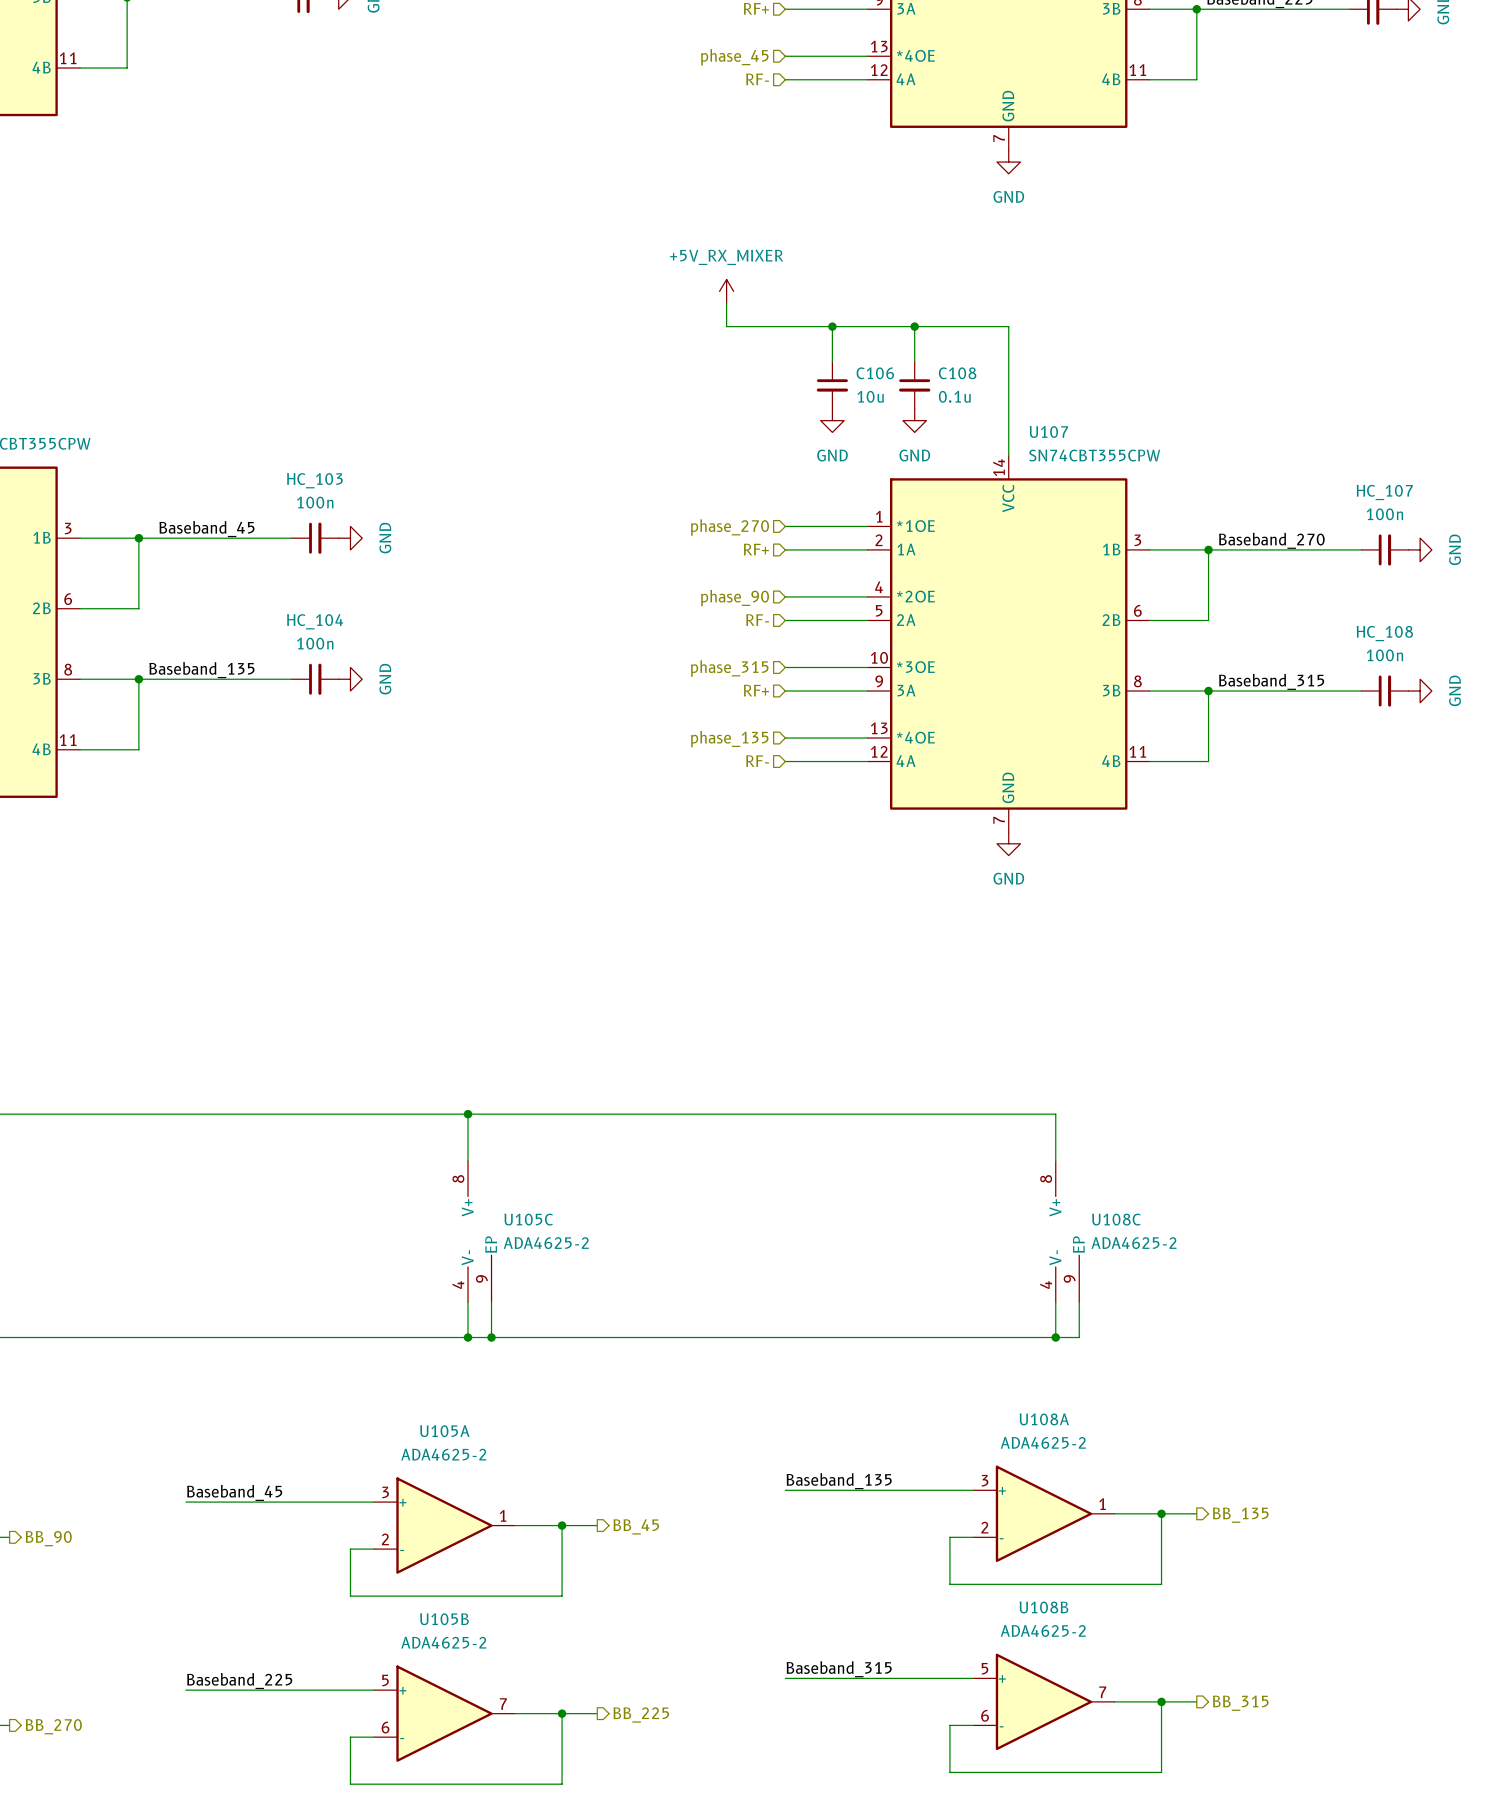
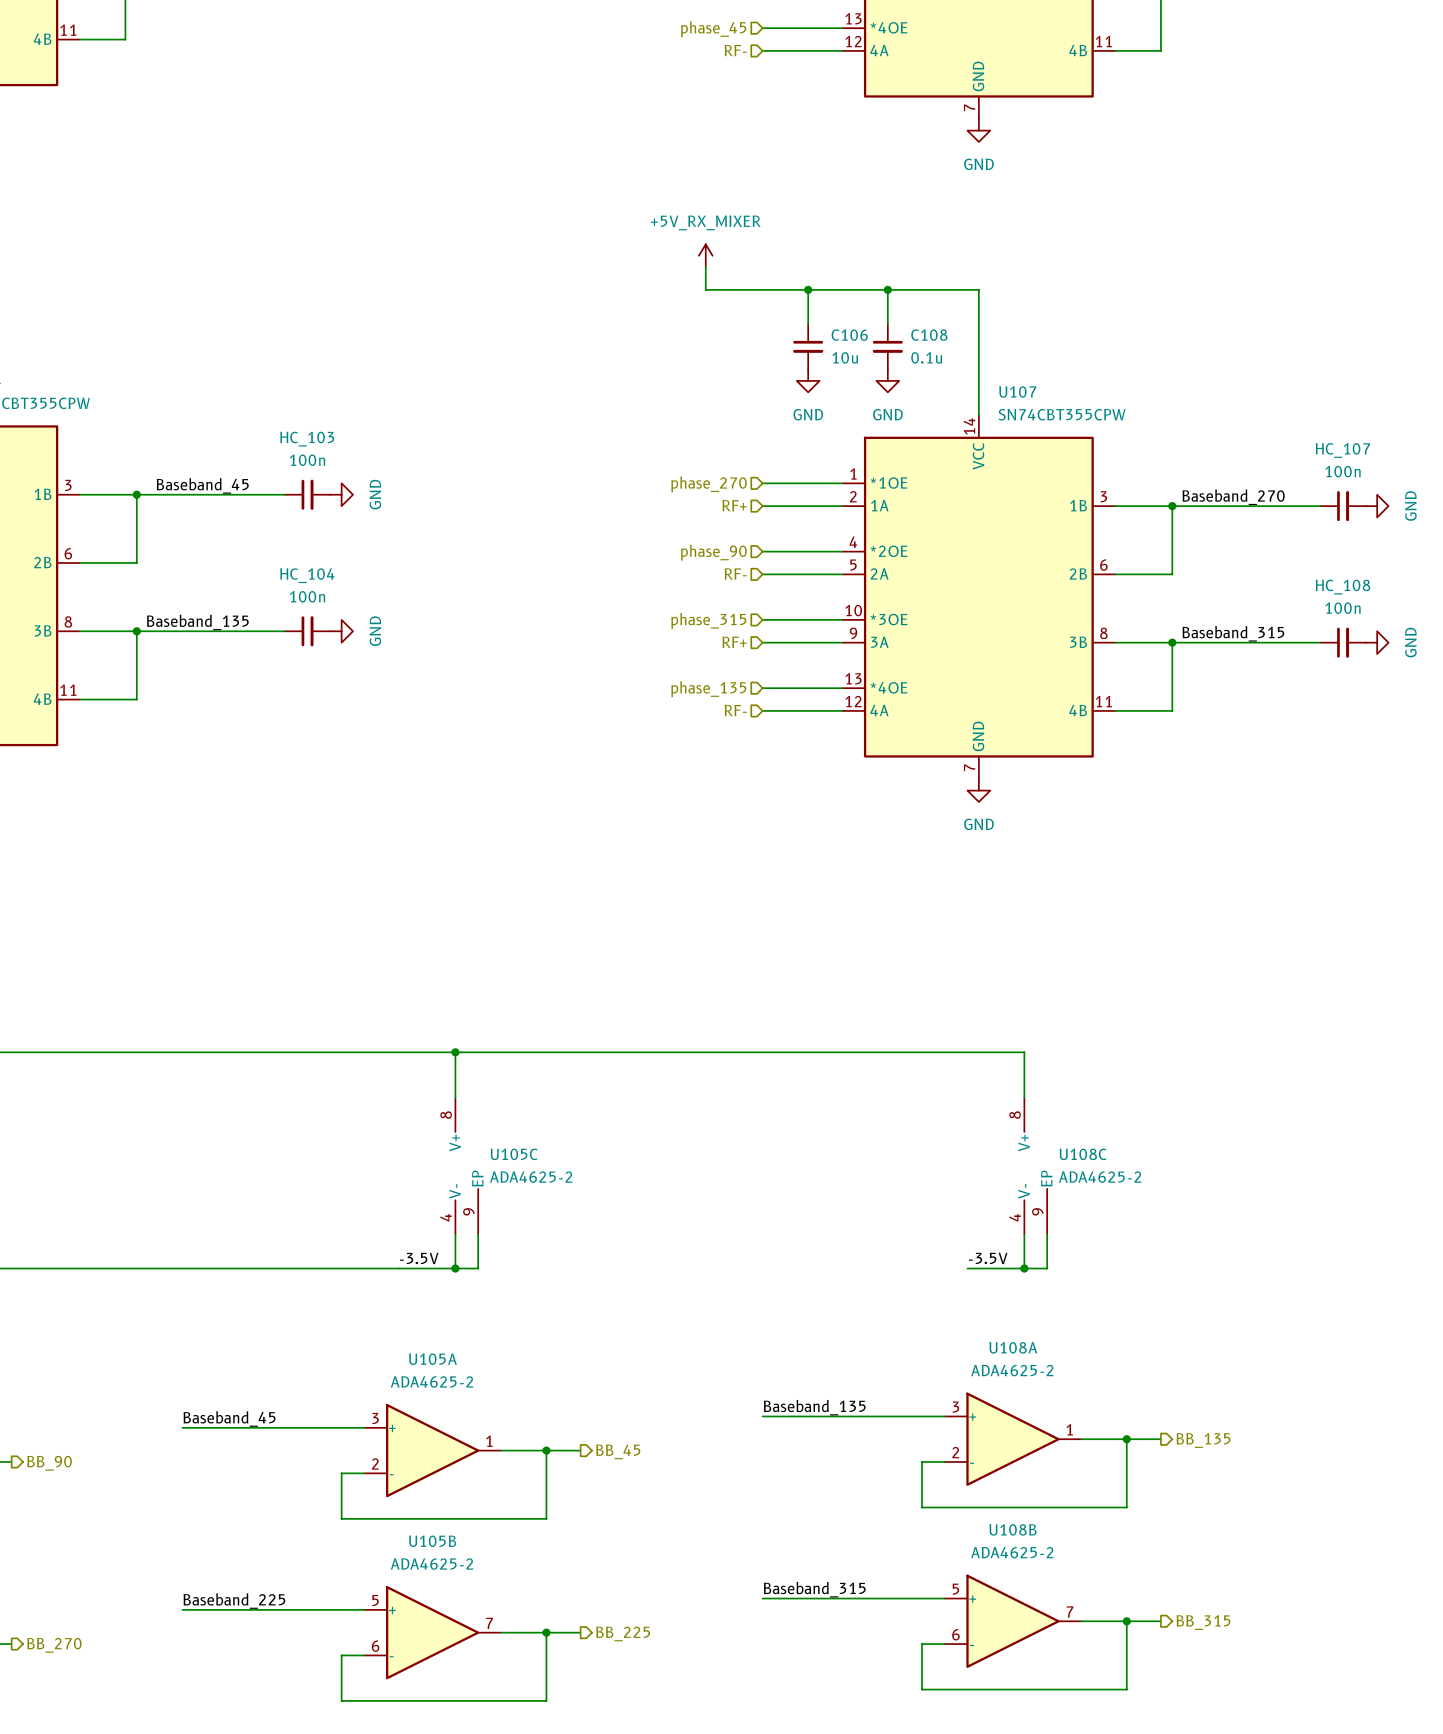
label: none -> -3.5V (419, 1258)
label: none -> -3.5V (988, 1258)
wire: (491, 1337) (996, 1337) -> none
junction: (491, 1337) -> none

